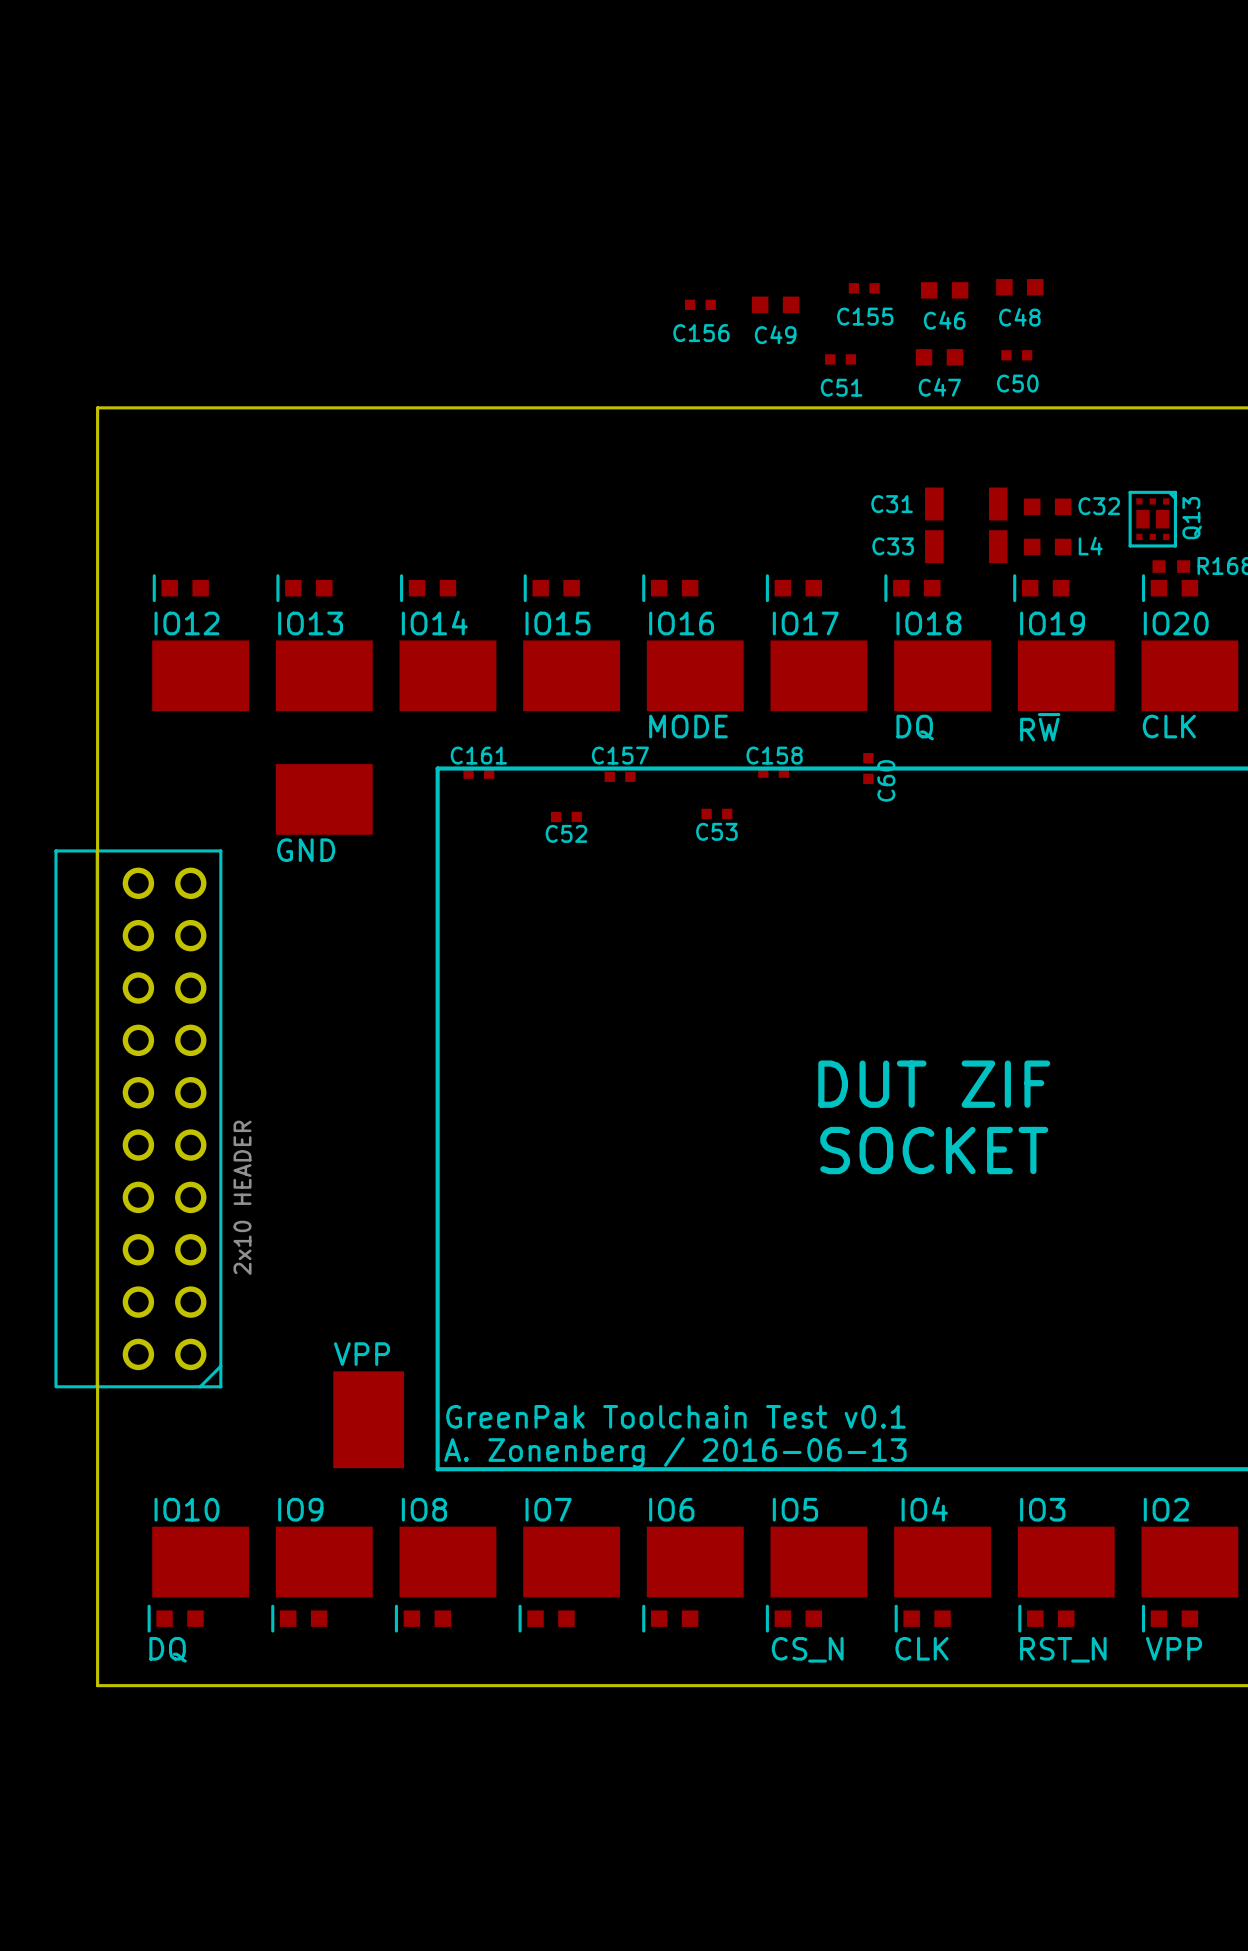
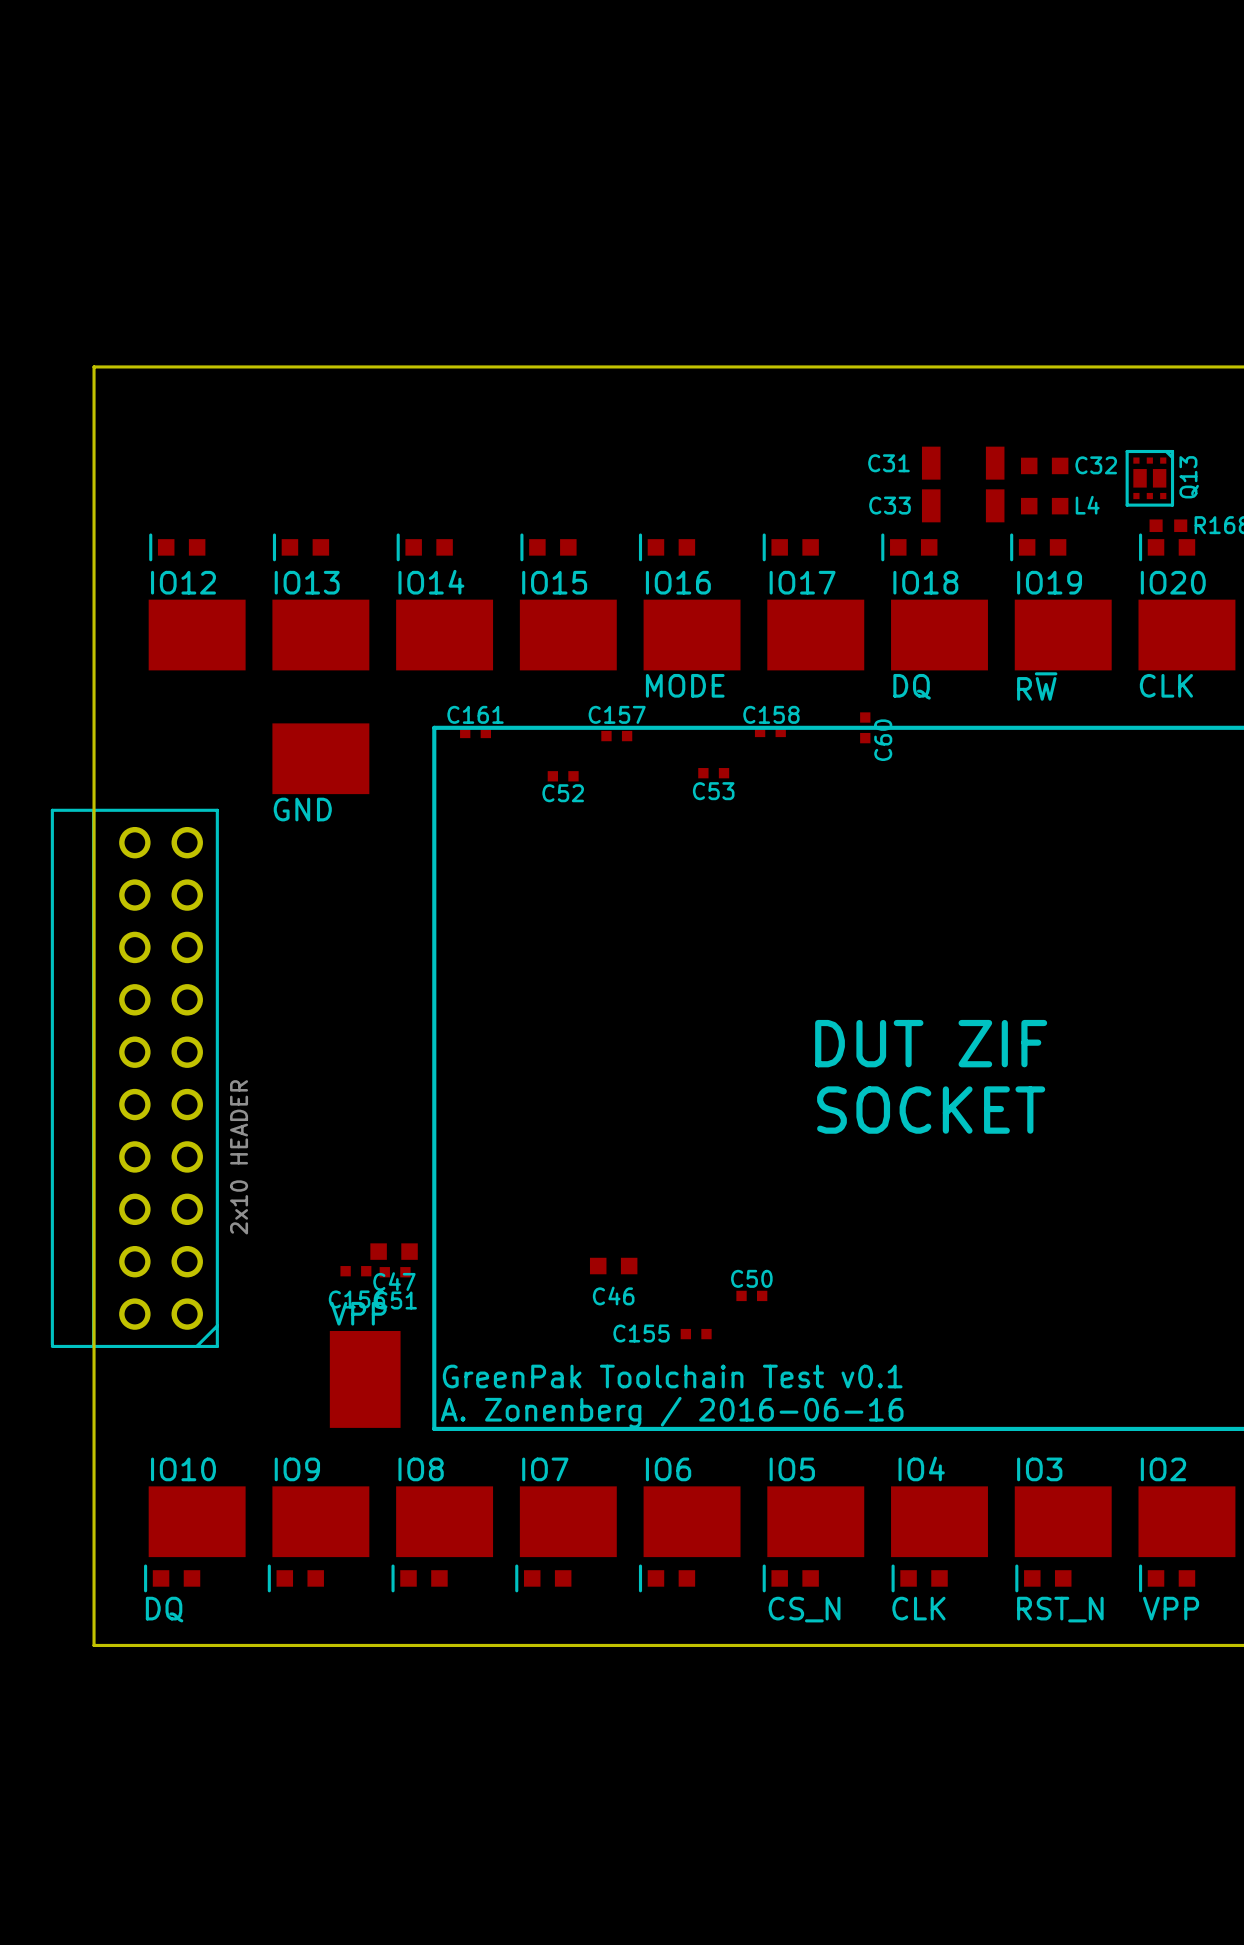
C48: (1019, 287) -> none
C155 position: (864, 288) -> (696, 1334)
C46 position: (944, 290) -> (613, 1266)
C156 position: (700, 304) -> (355, 1271)
C49: (775, 304) -> none
C155 name position: C155 (865, 316) -> C155 (641, 1333)
C50 position: (1016, 355) -> (751, 1295)
C47 position: (939, 357) -> (394, 1251)
C51 position: (840, 359) -> (395, 1272)
C50 name position: C50 (1017, 383) -> C50 (751, 1278)
text: A. Zonenberg / 2016-06-13 (675, 1452) -> A. Zonenberg / 2016-06-16 (672, 1412)

